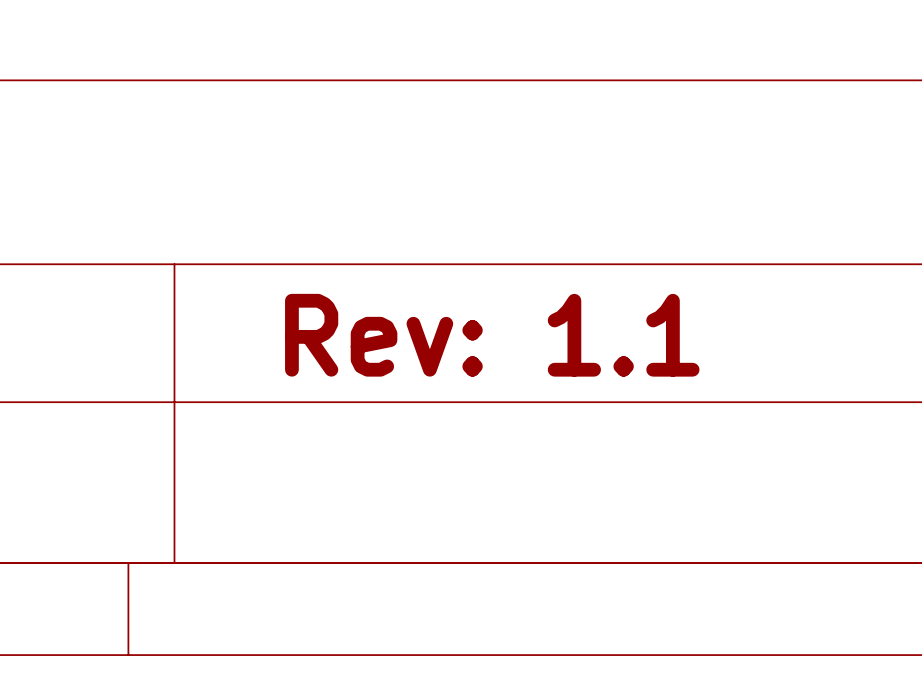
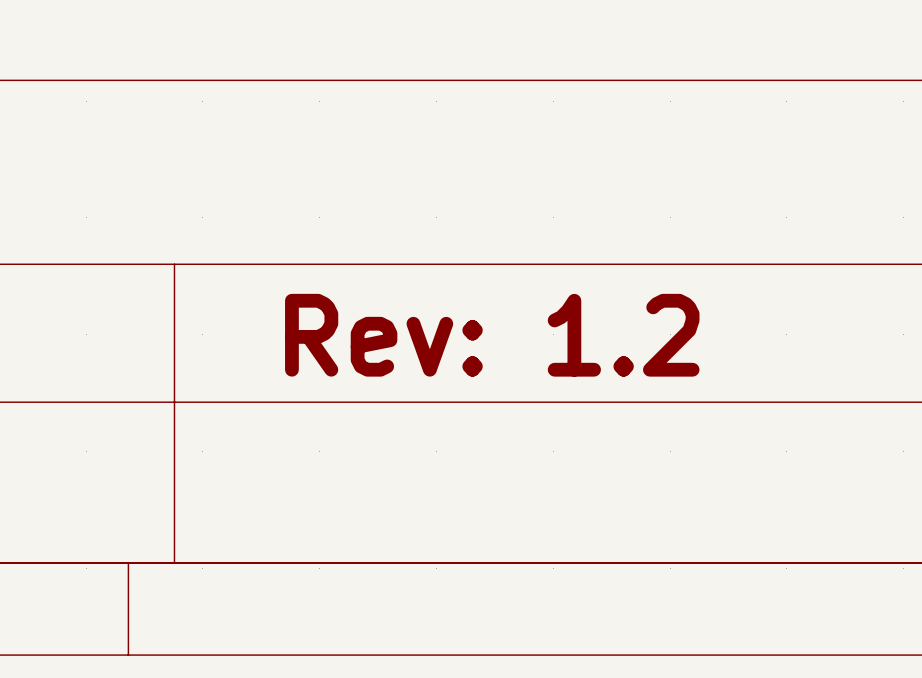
title block: Rev: 1.1 (492, 335) -> Rev: 1.2 (492, 335)

